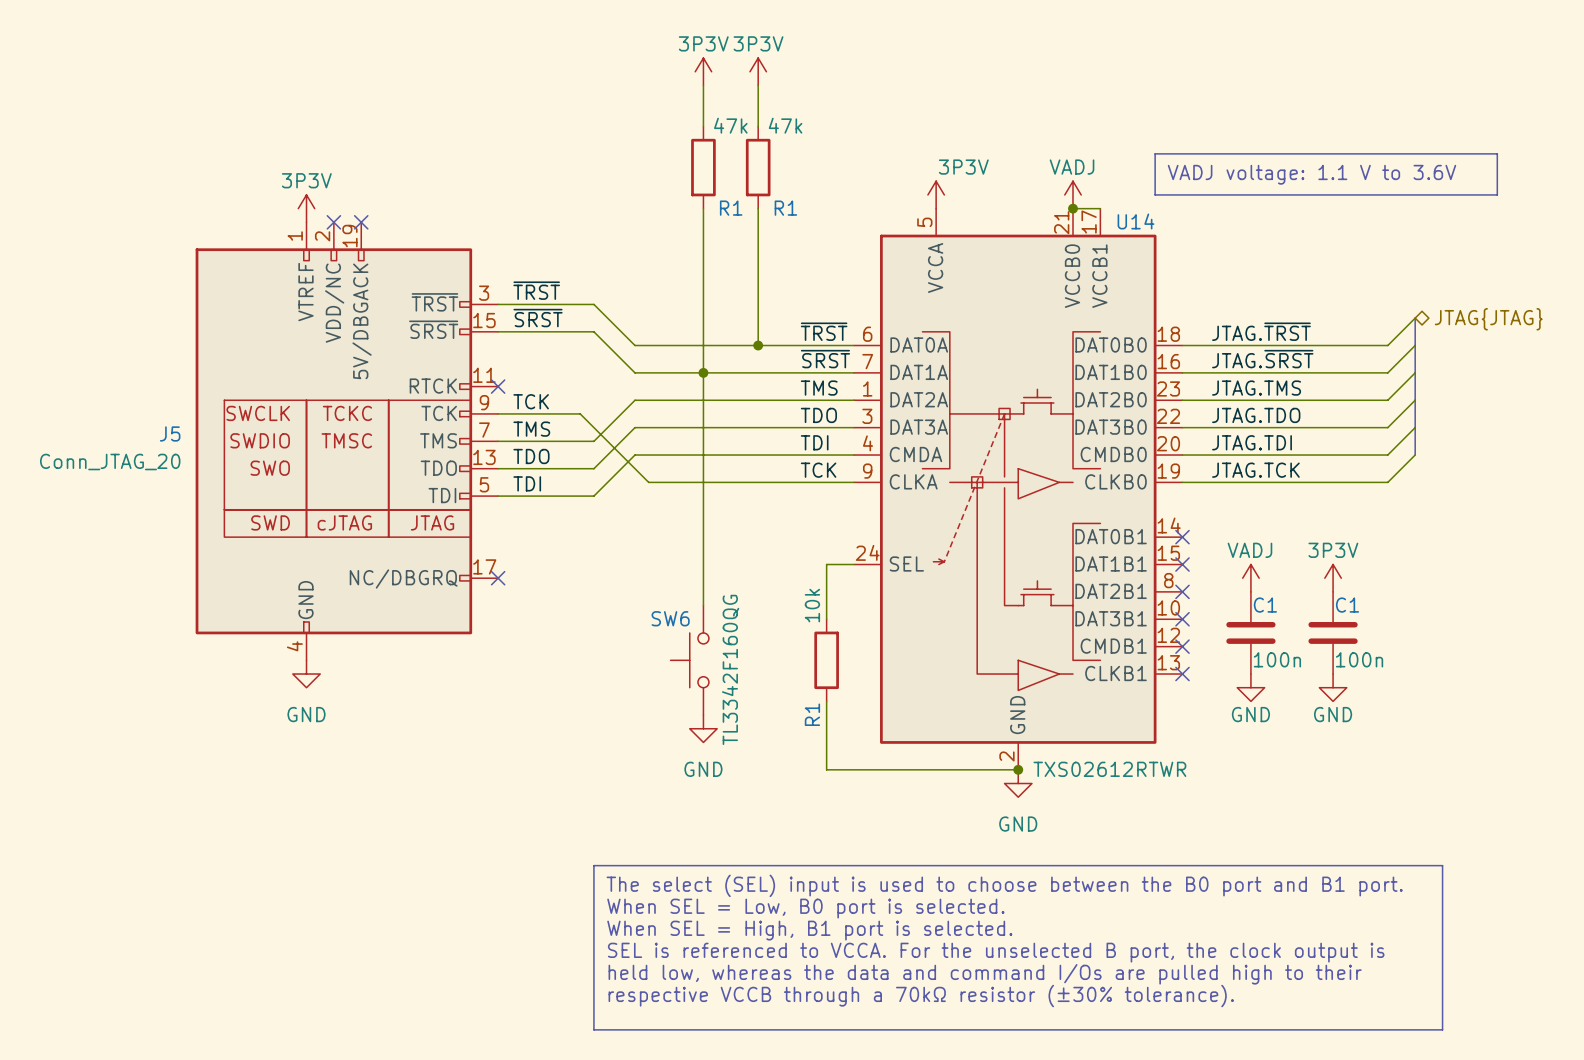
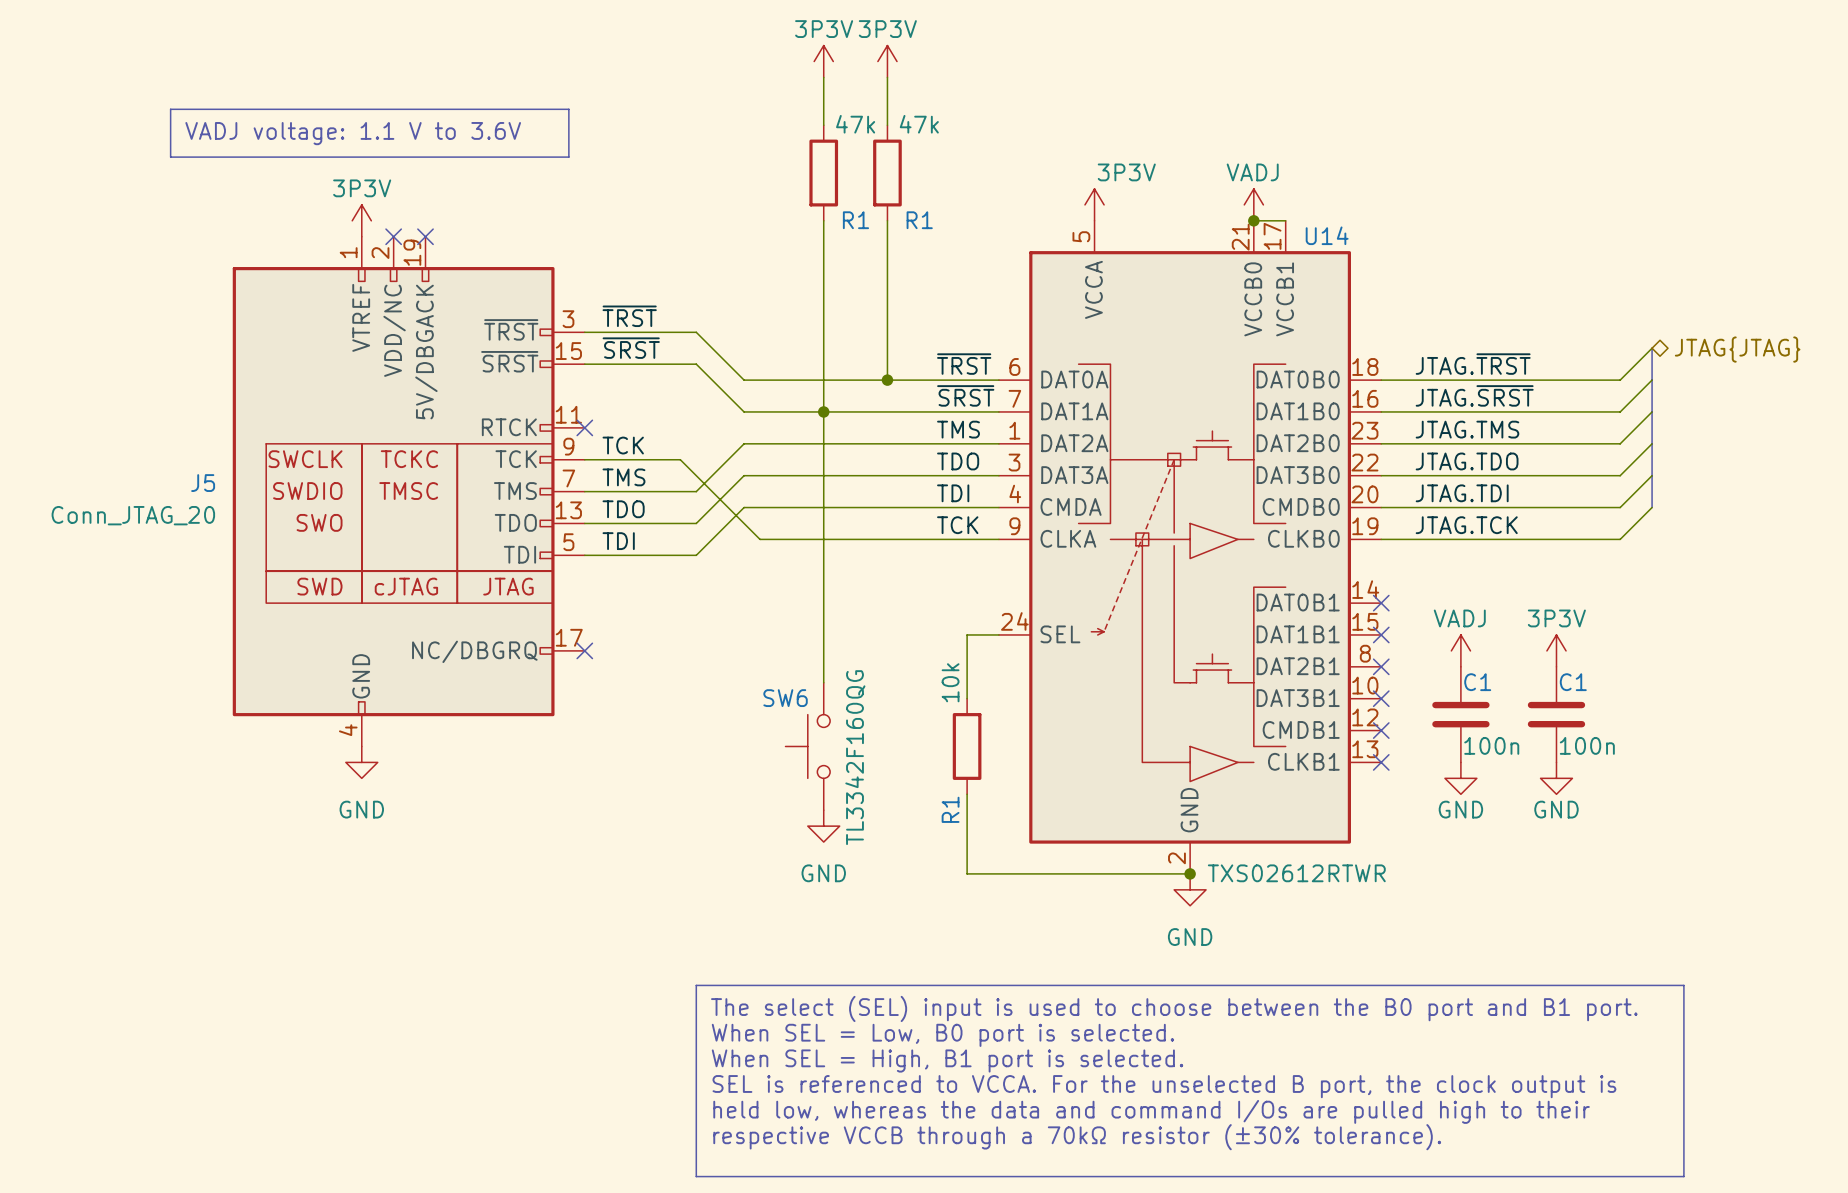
line: none -> (170, 109) (568, 109) (568, 157) (170, 157) (170, 109)
text: none -> VADJ voltage: 1.1 V to 3.6V (353, 133)
line: (1155, 153) (1497, 153) (1497, 194) (1155, 194) (1155, 153) -> none
text: VADJ voltage: 1.1 V to 3.6V (1311, 174) -> none

